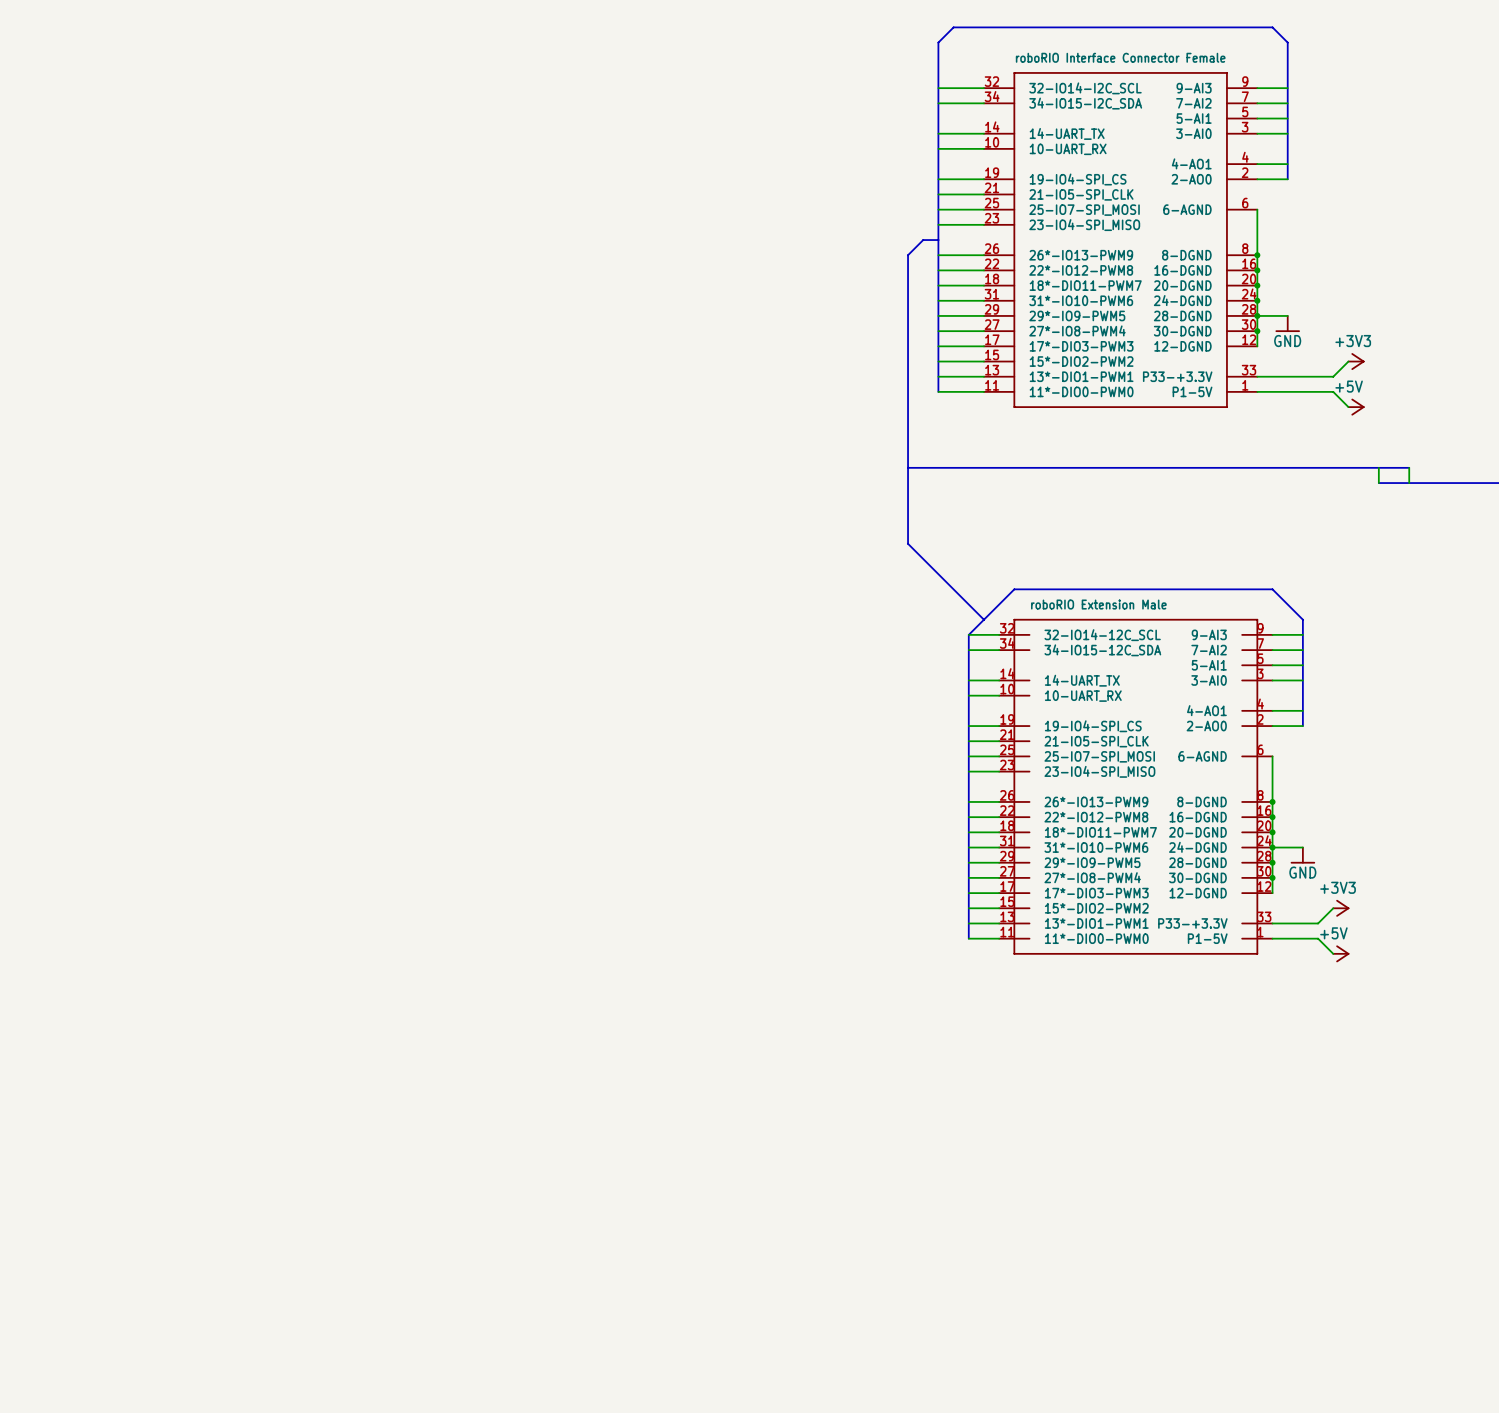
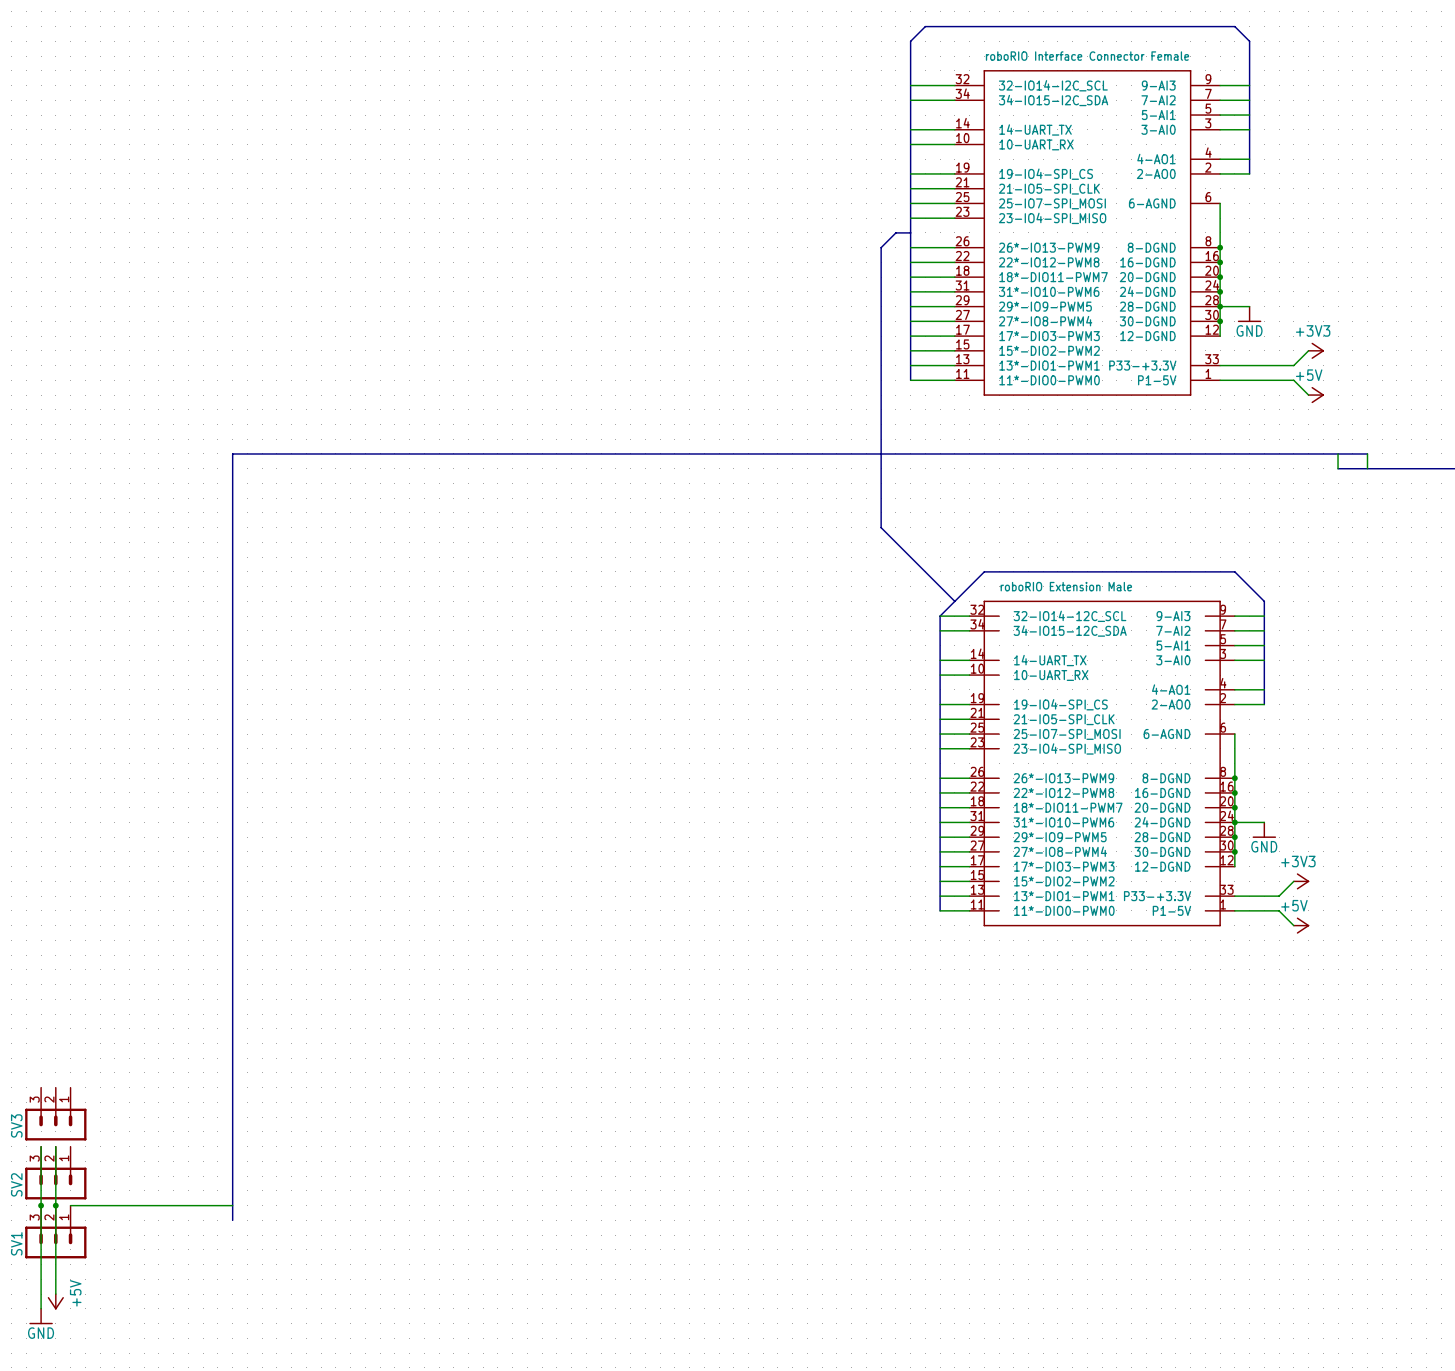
bus: none -> (881, 453) (232, 453) (232, 1220)
SV3: none -> (55, 1114)
wire: none -> (41, 1146) (41, 1308)
wire: none -> (55, 1146) (55, 1294)
SV2: none -> (55, 1173)
junction: none -> (41, 1205)
junction: none -> (55, 1205)
wire: none -> (70, 1205) (232, 1205)
SV1: none -> (55, 1232)
power symbol: none -> +5V (55, 1301)
power symbol: none -> GND (41, 1316)

